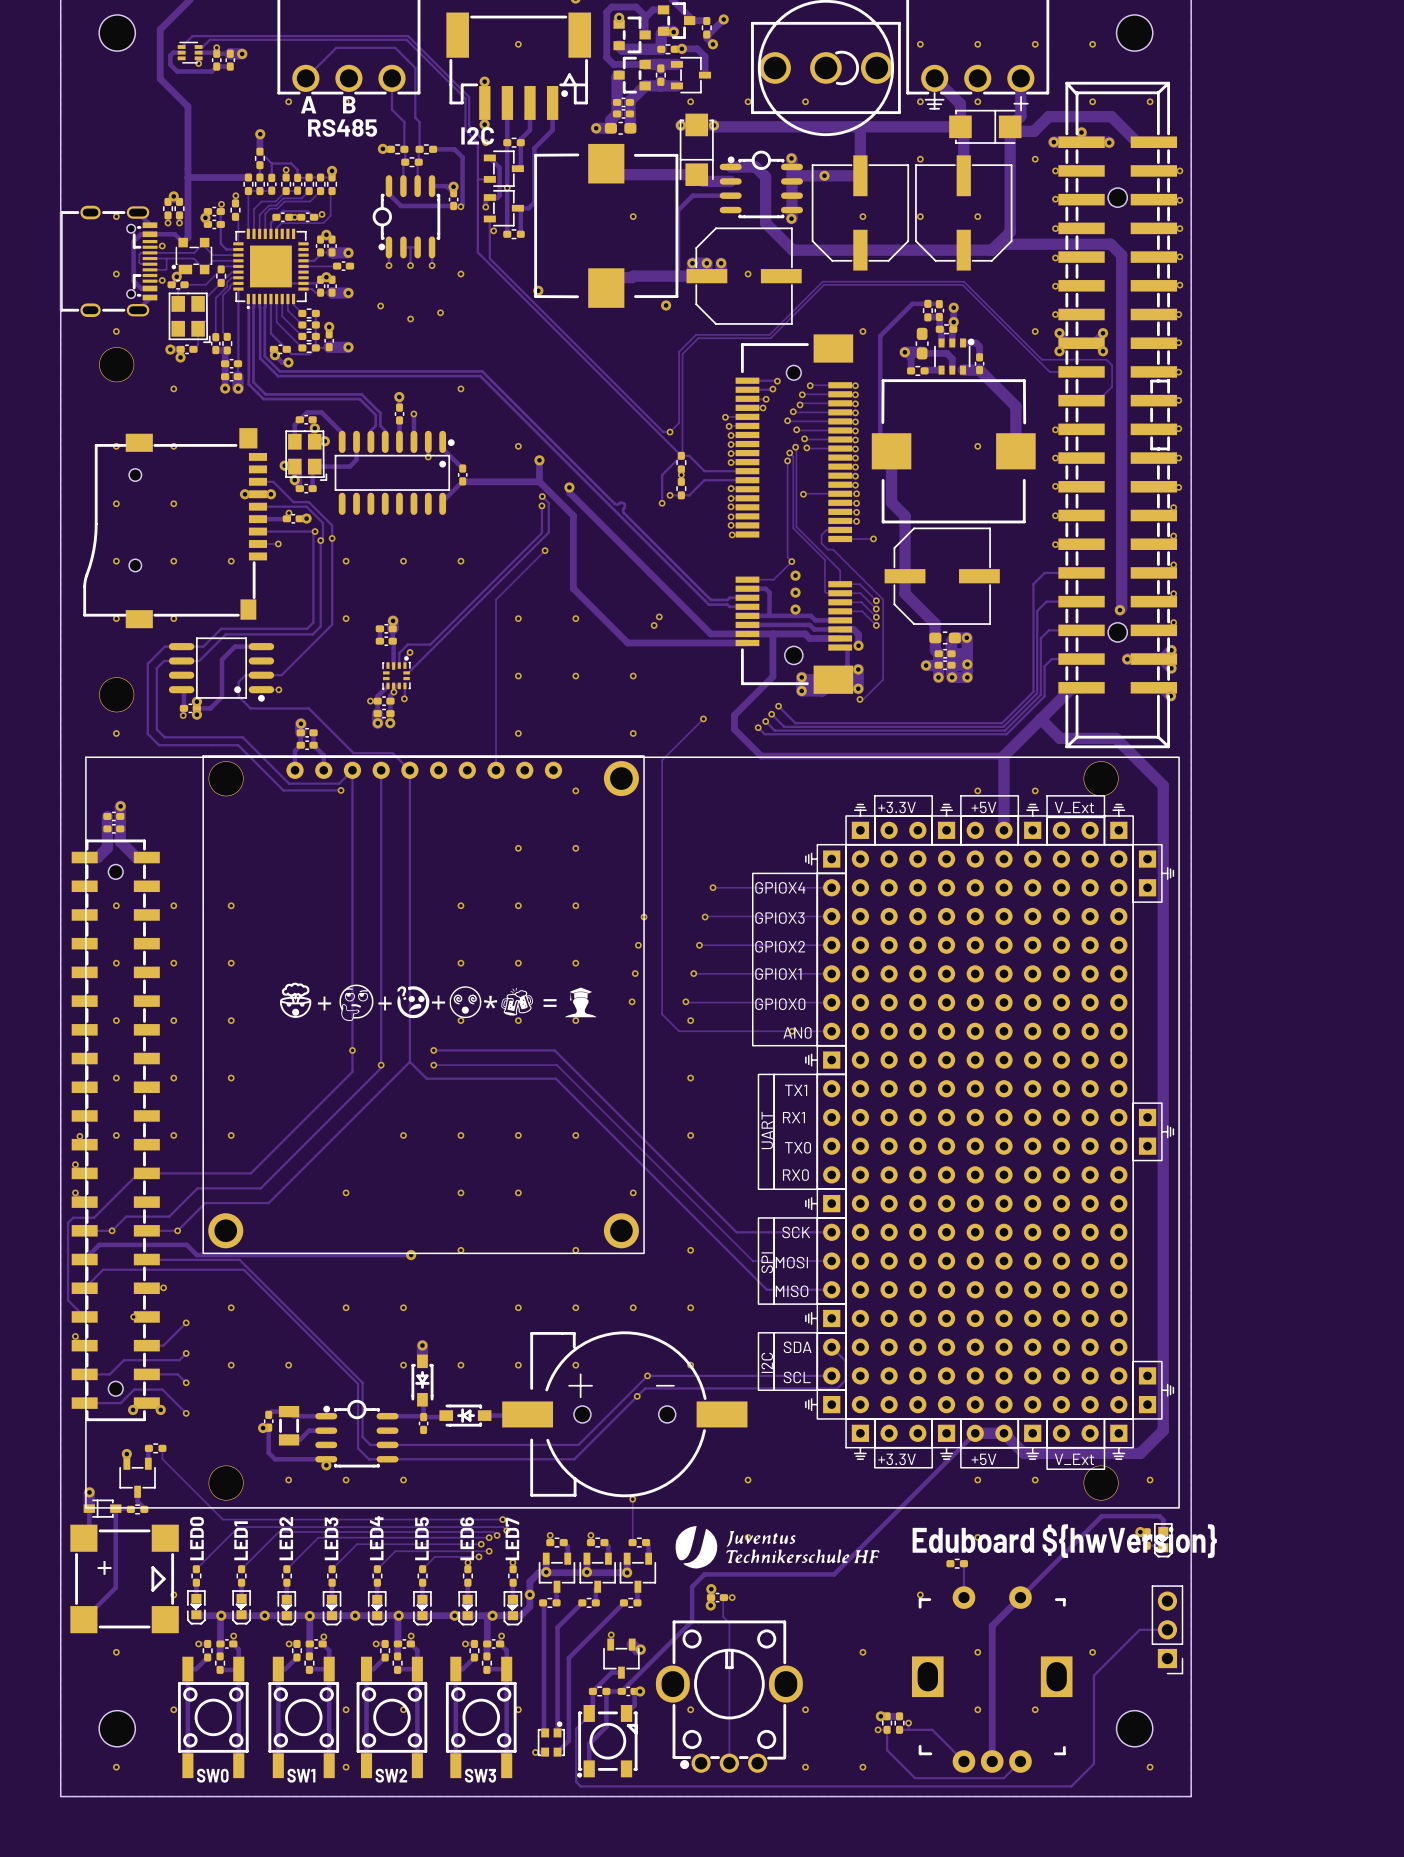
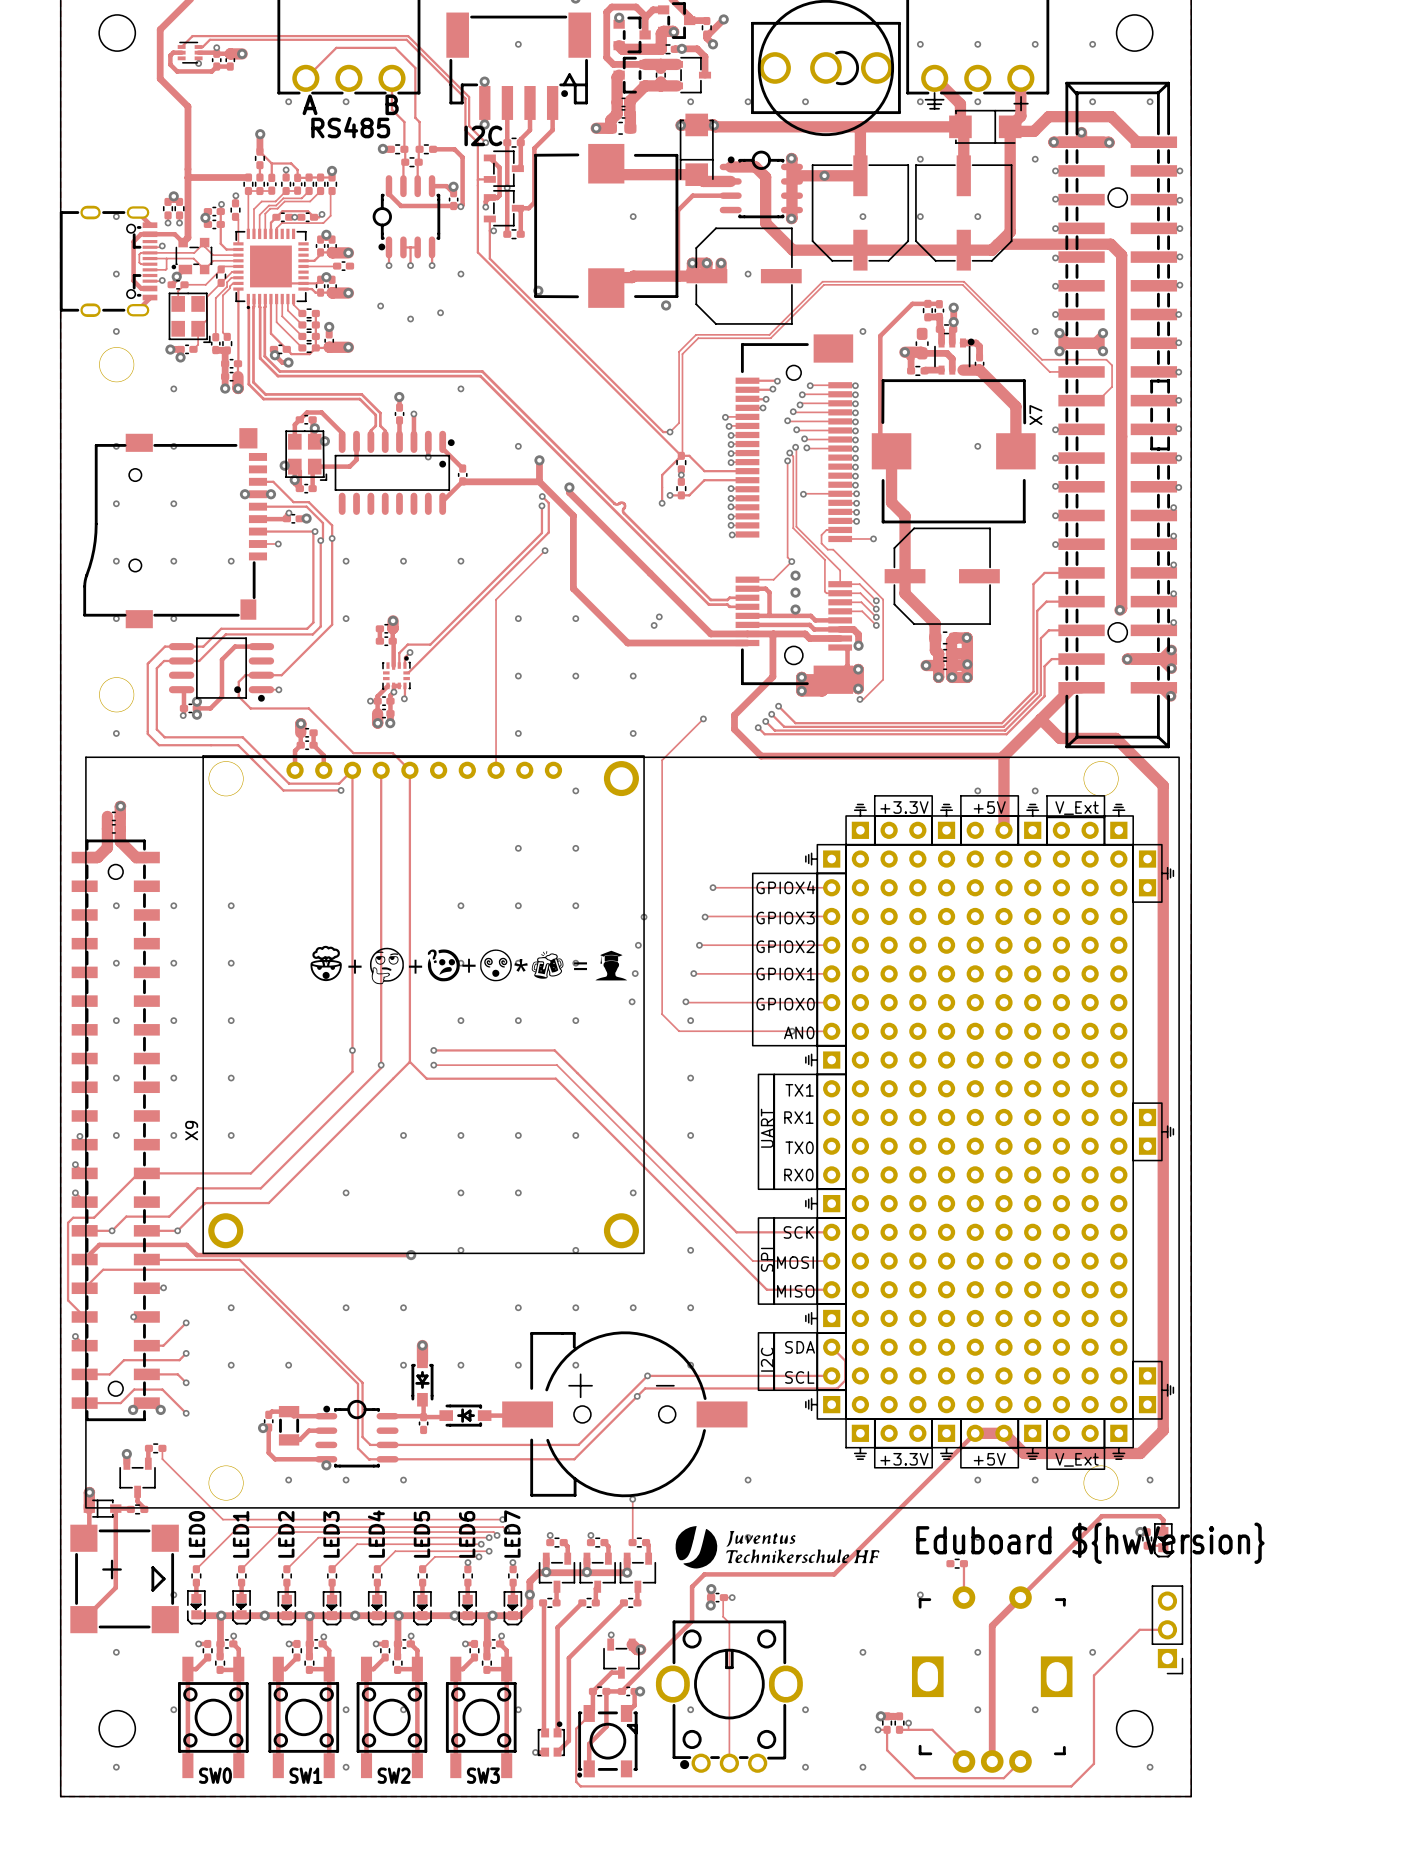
X7 name: none -> X7 (1035, 415)
drawing position: (438, 1001) -> (468, 965)
X9 name: none -> X9 (191, 1130)

